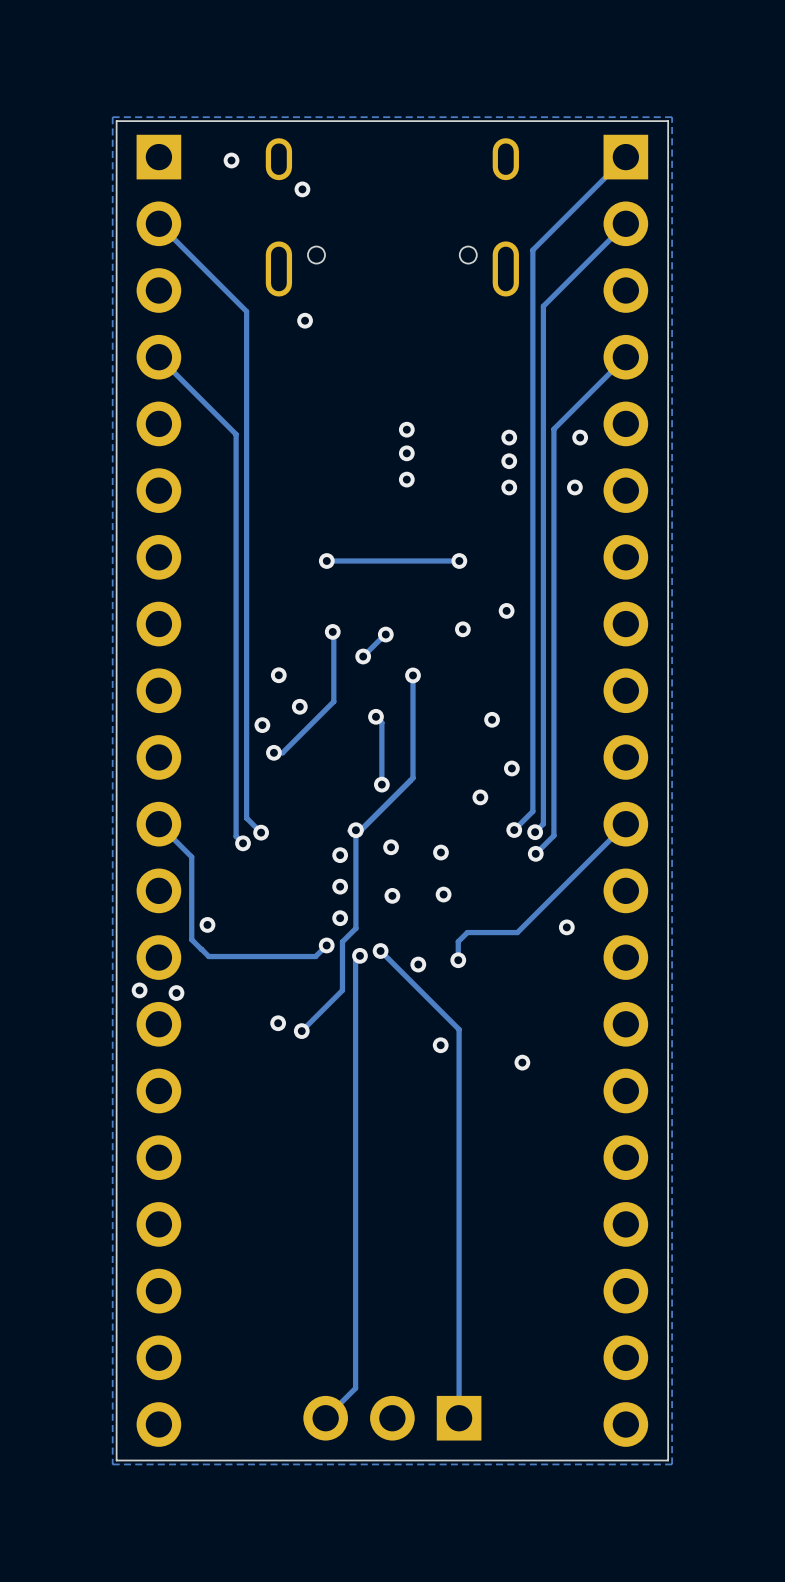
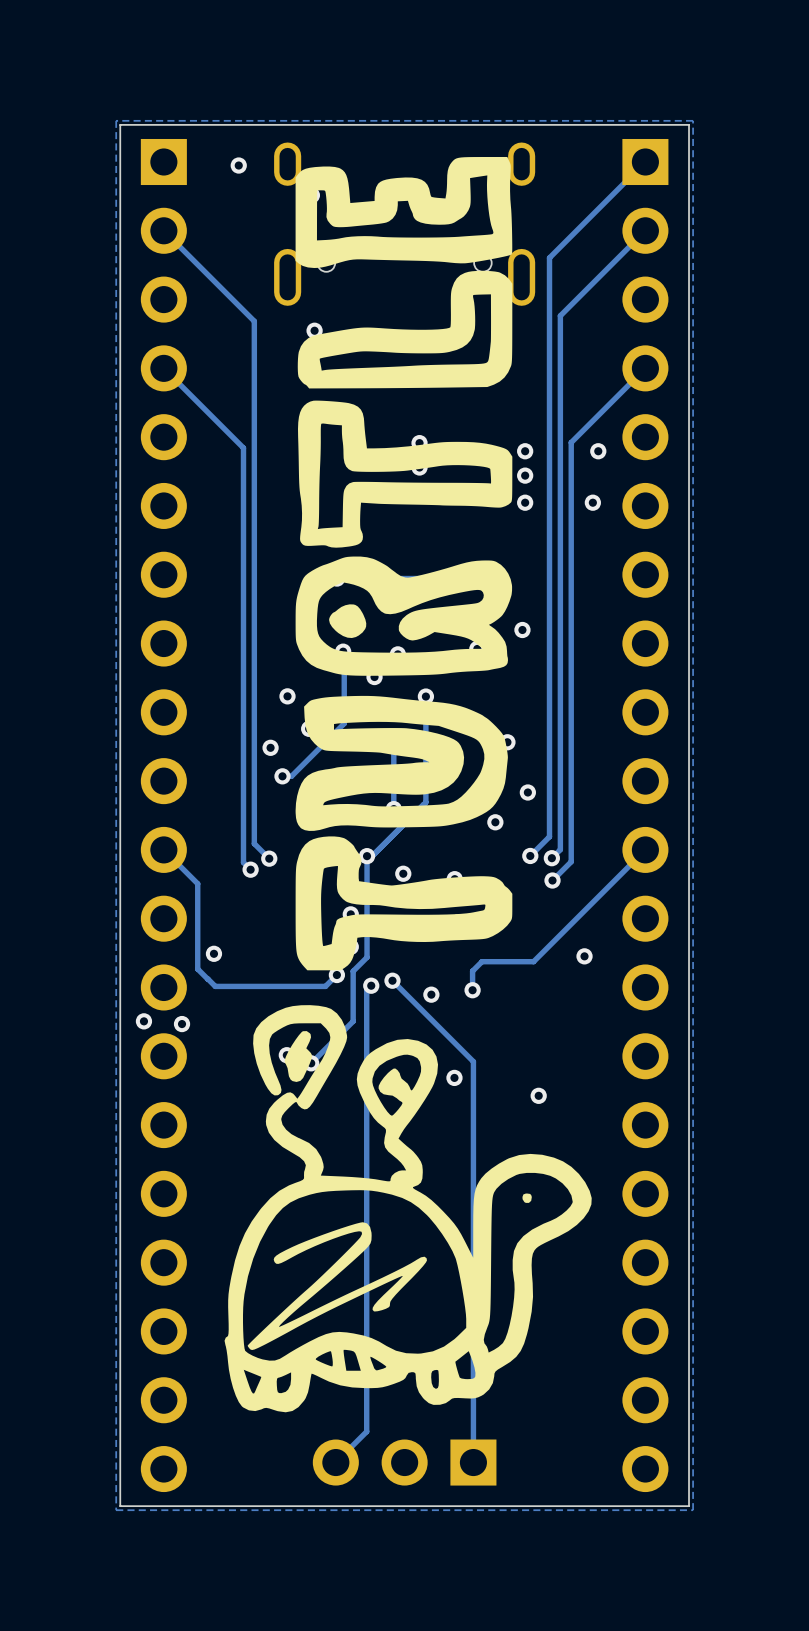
drawing: none -> [295, 156, 513, 971]
drawing: none -> [224, 1005, 592, 1413]

